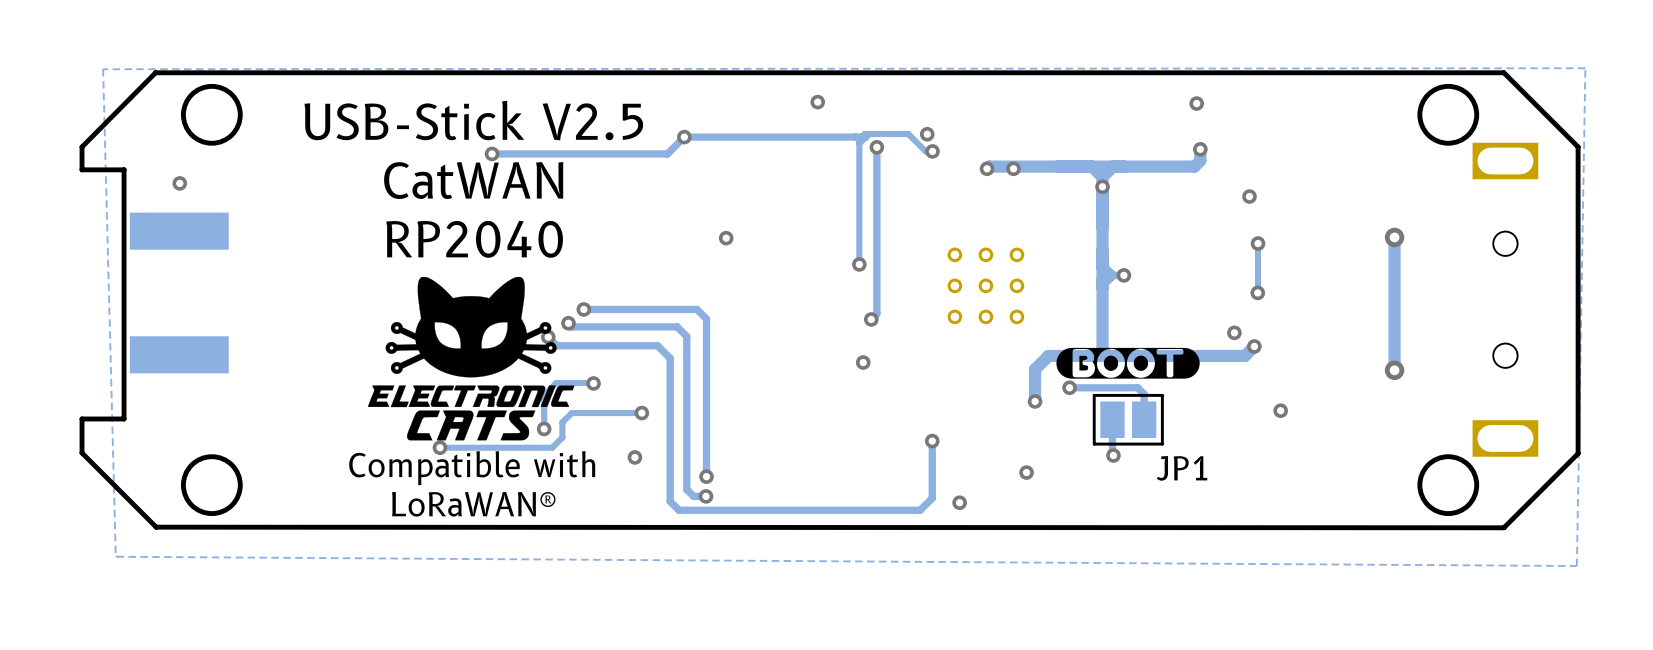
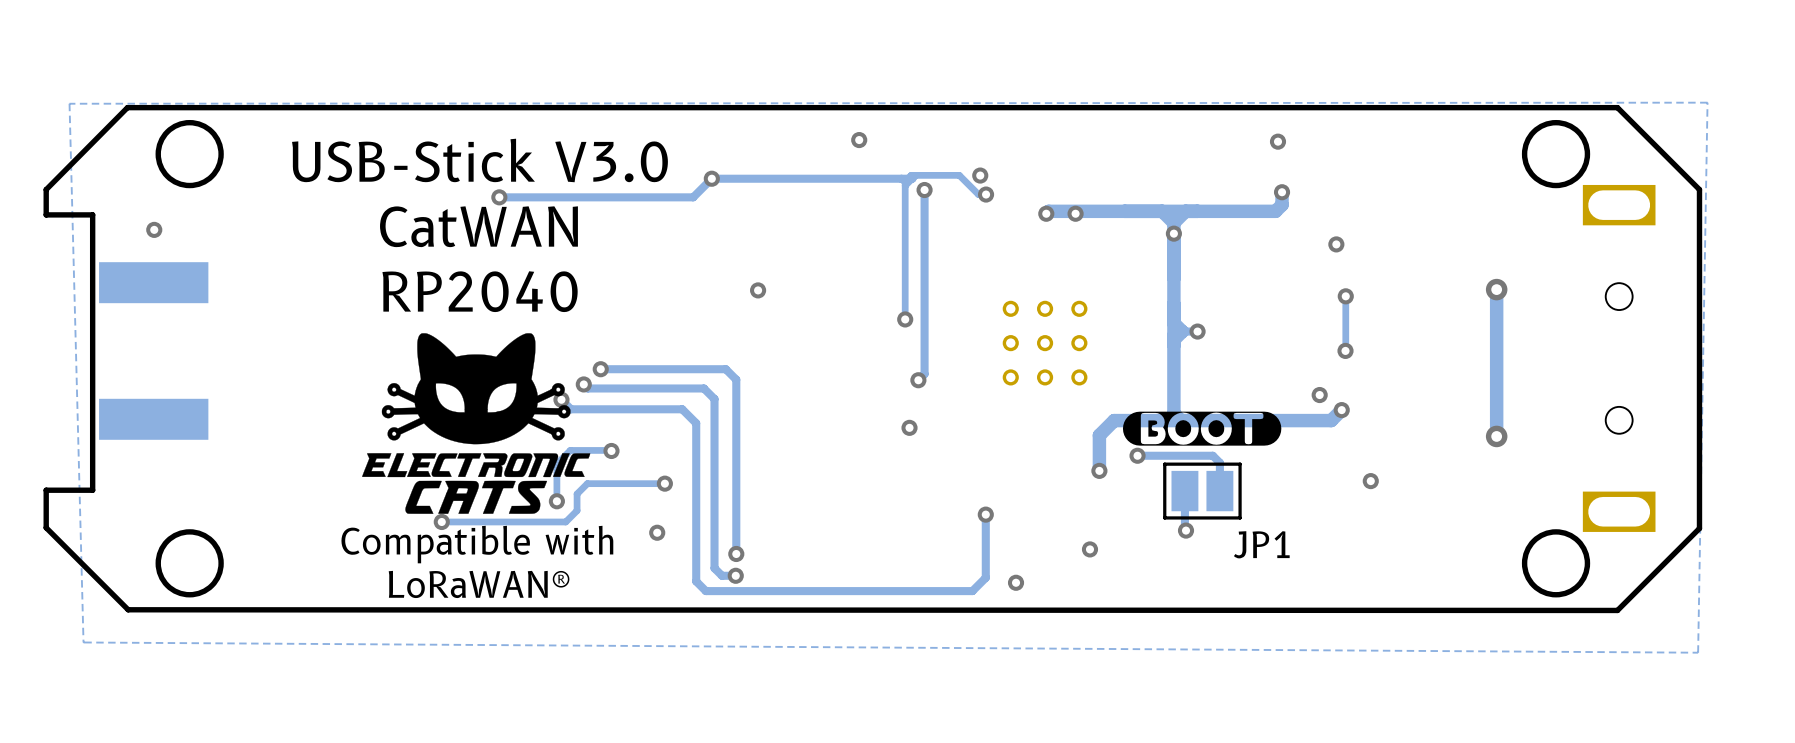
text: USB-Stick V2.5 (473, 120) -> USB-Stick V3.0 (479, 160)

